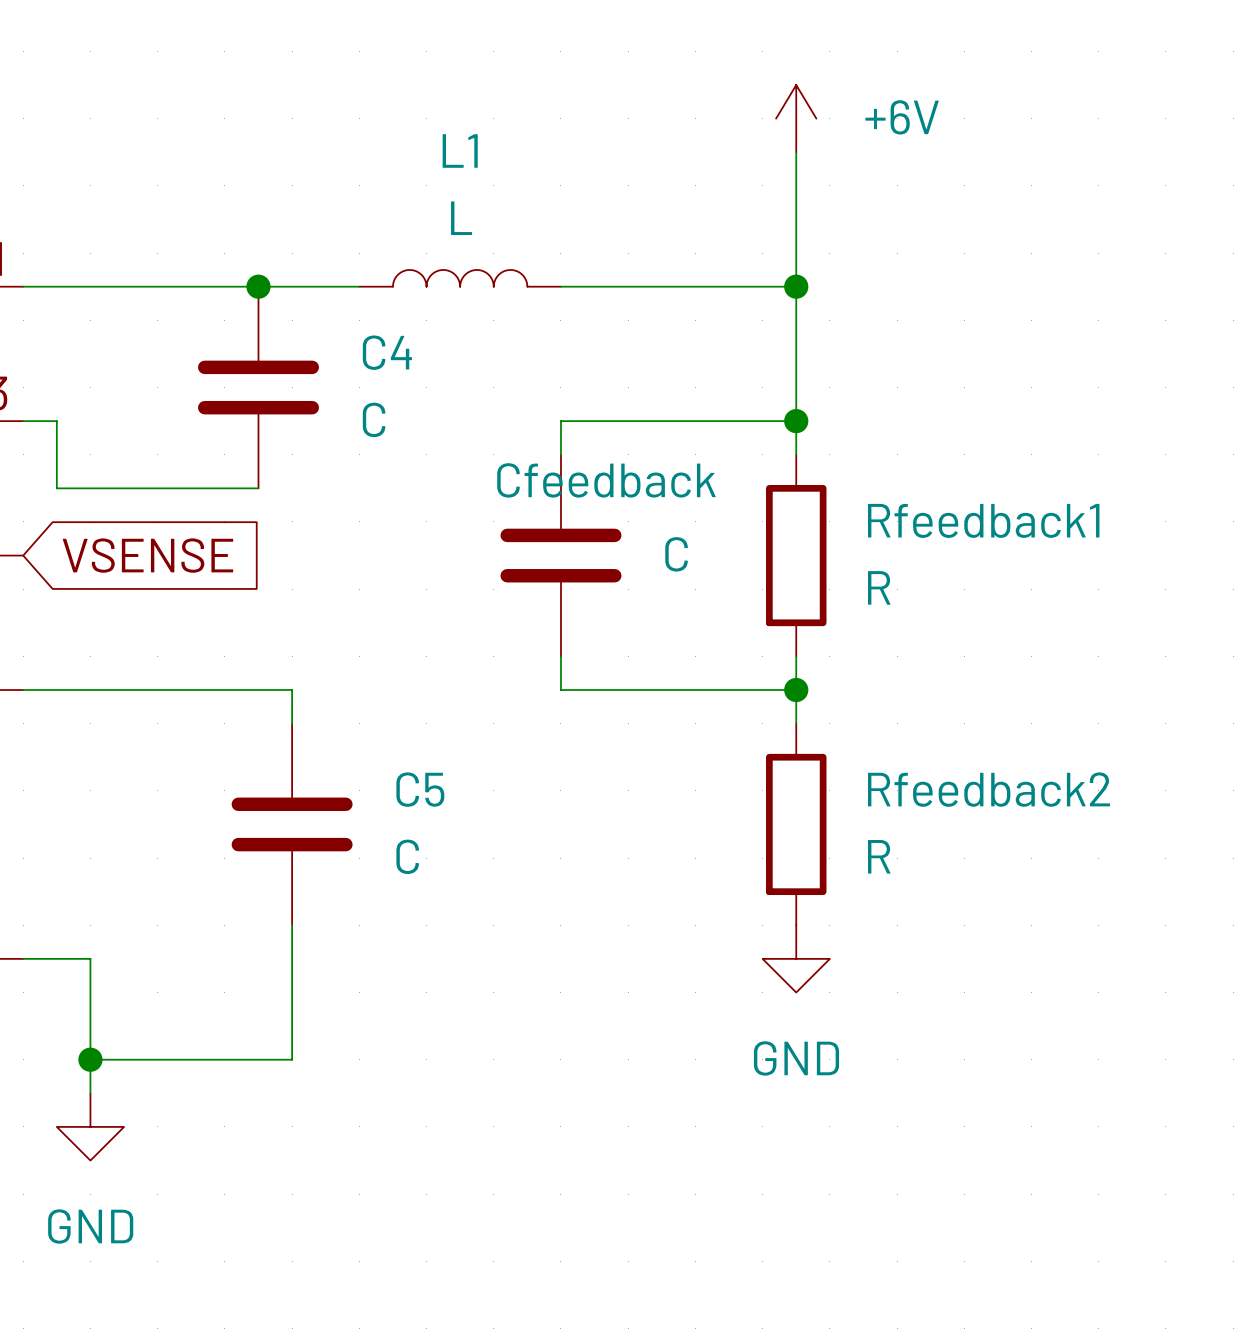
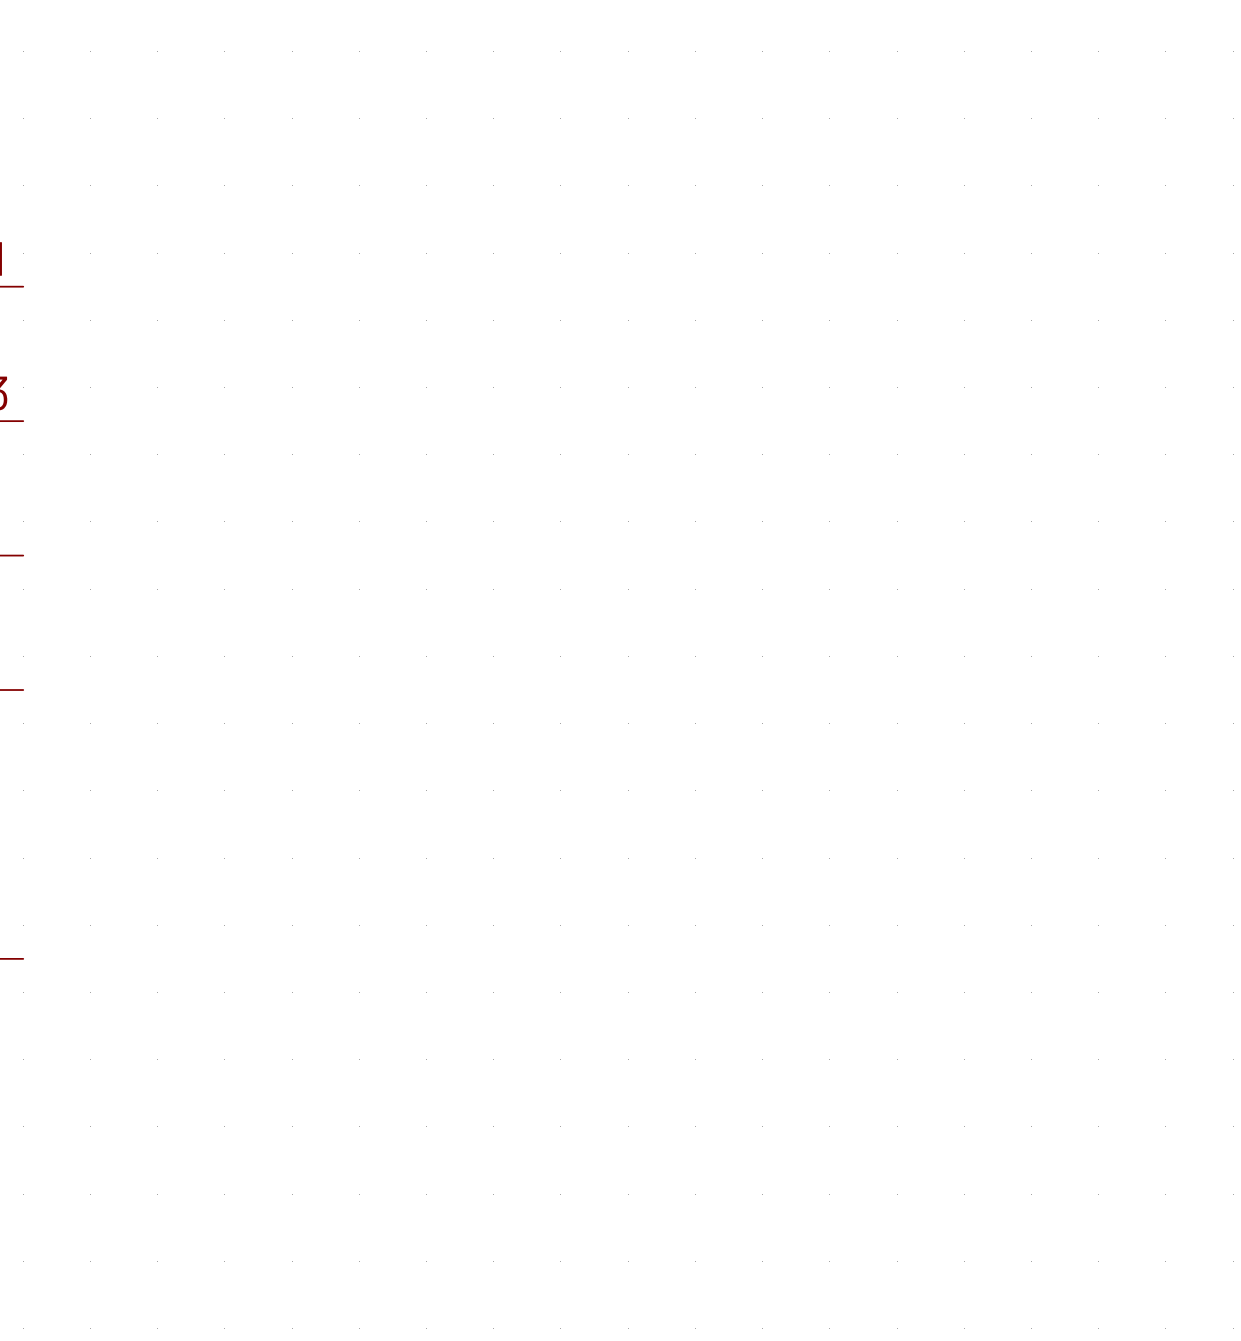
power symbol: +6V (796, 118) -> none
wire: (796, 152) (796, 454) -> none
L1: L (460, 278) -> none
wire: (23, 286) (359, 286) -> none
junction: (258, 286) -> none
wire: (560, 286) (796, 286) -> none
junction: (796, 286) -> none
C4: C (258, 387) -> none
wire: (23, 421) (56, 421) (56, 488) (258, 488) -> none
wire: (796, 421) (560, 421) (560, 454) -> none
junction: (796, 421) -> none
global label: VSENSE (147, 555) -> none
Cfeedback: C (560, 555) -> none
Rfeedback1: R (796, 555) -> none
wire: (560, 656) (560, 690) (796, 690) -> none
wire: (796, 656) (796, 723) -> none
wire: (23, 690) (292, 690) (292, 723) -> none
junction: (796, 690) -> none
C5: C (292, 824) -> none
Rfeedback2: R (796, 824) -> none
wire: (292, 925) (292, 1059) (90, 1059) -> none
wire: (23, 958) (90, 958) (90, 1093) -> none
power symbol: GND (796, 958) -> none
junction: (90, 1059) -> none
power symbol: GND (90, 1126) -> none

